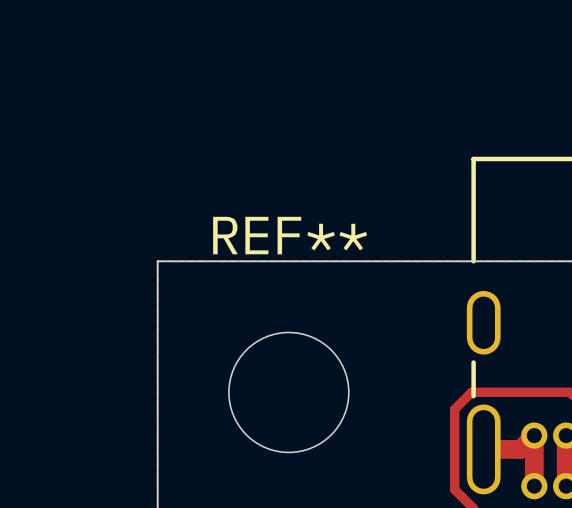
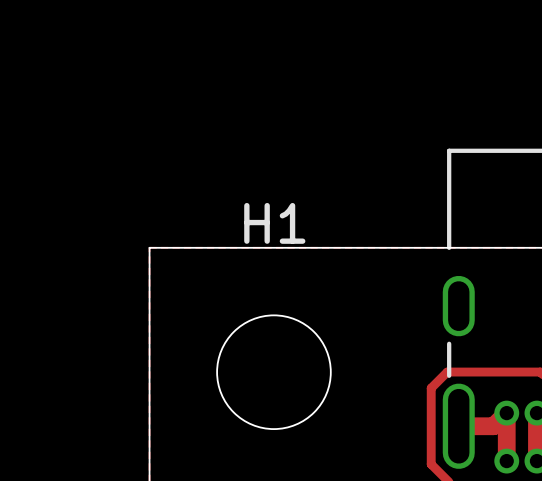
REF** name: REF** (290, 235) -> H1 (274, 223)

